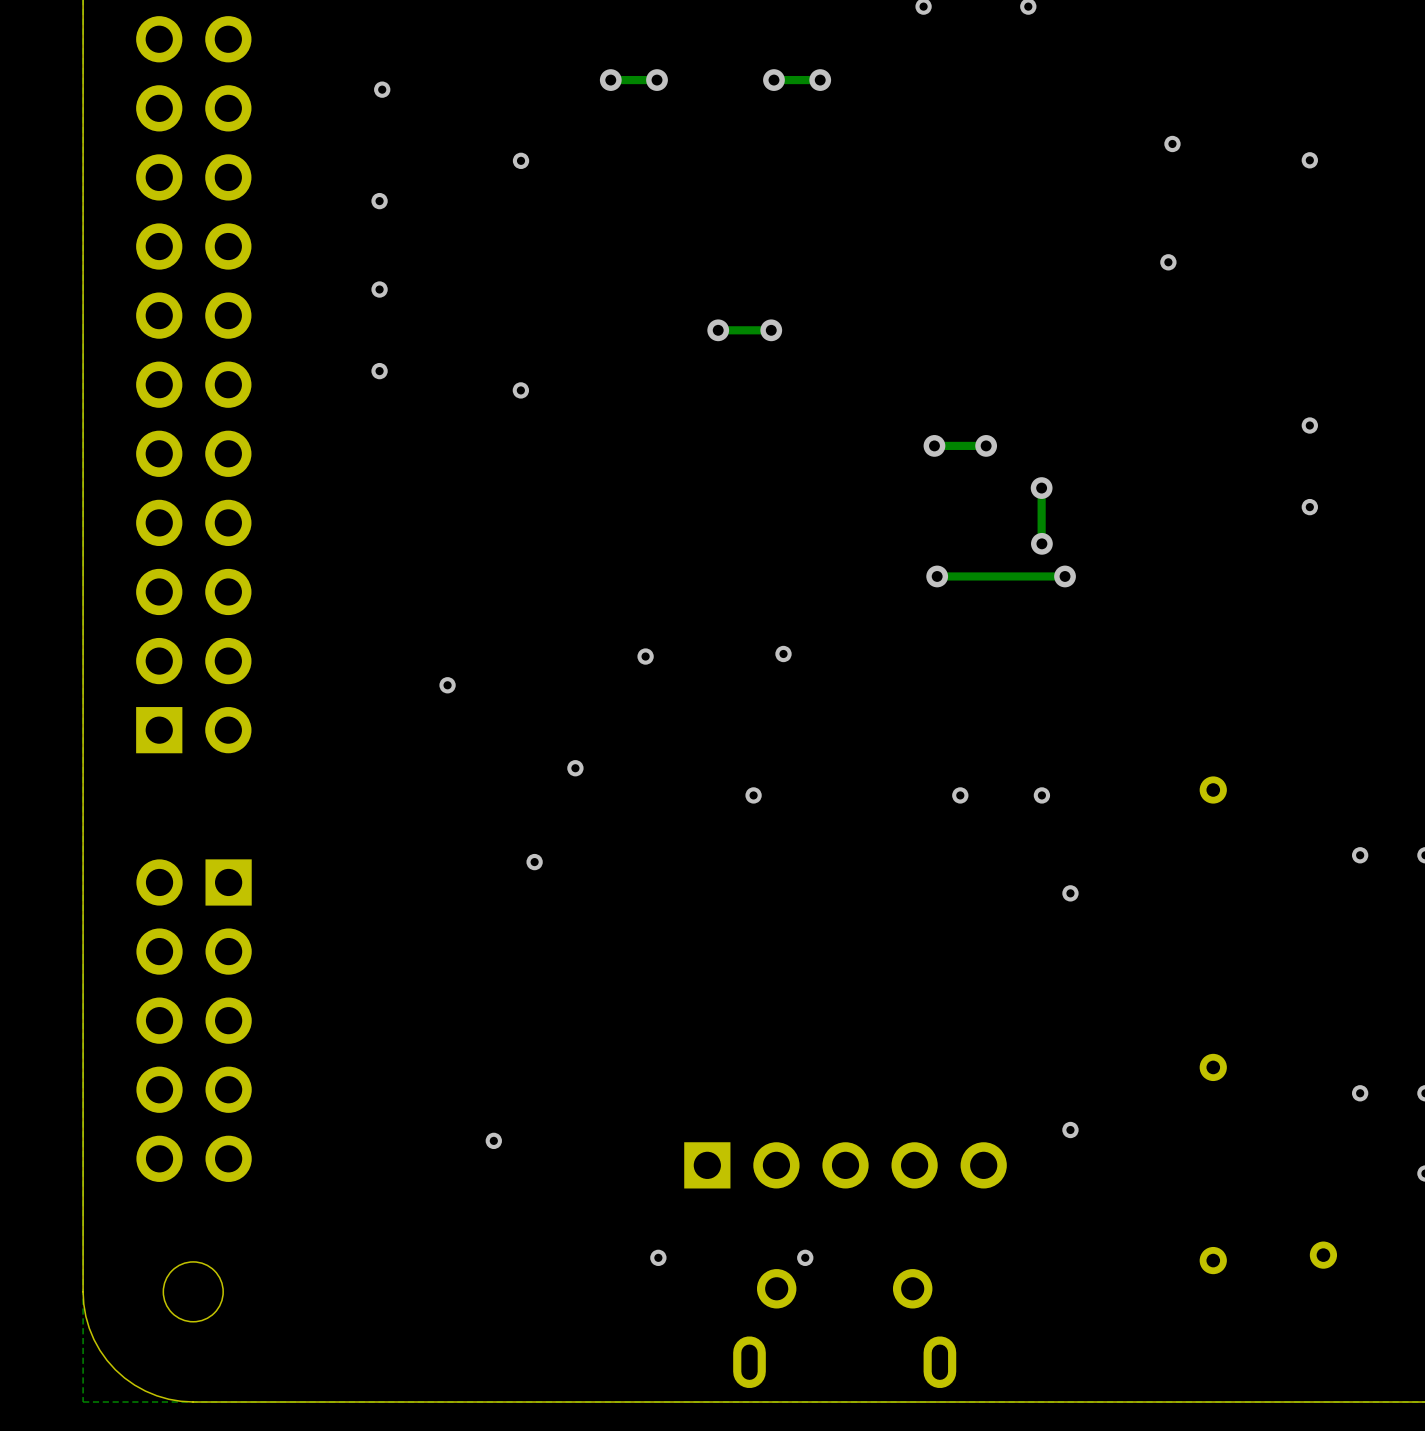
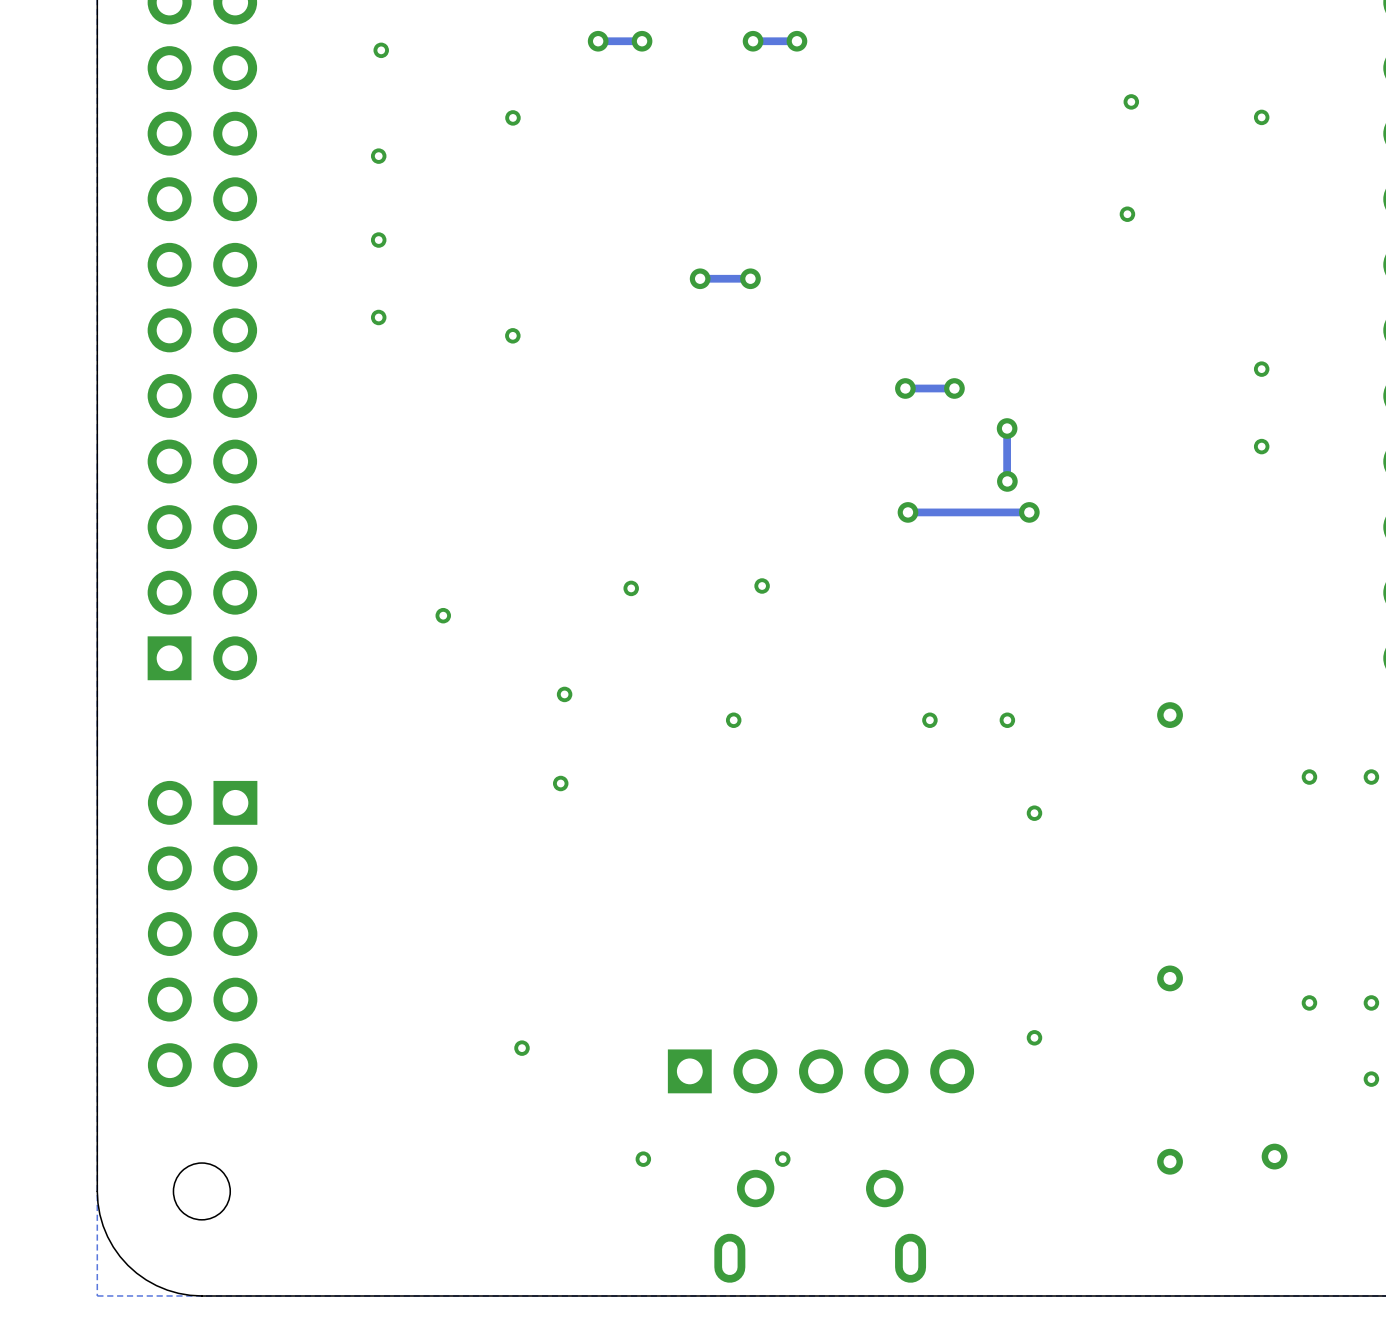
via position: (534, 862) -> (560, 783)
via position: (493, 1140) -> (522, 1048)

